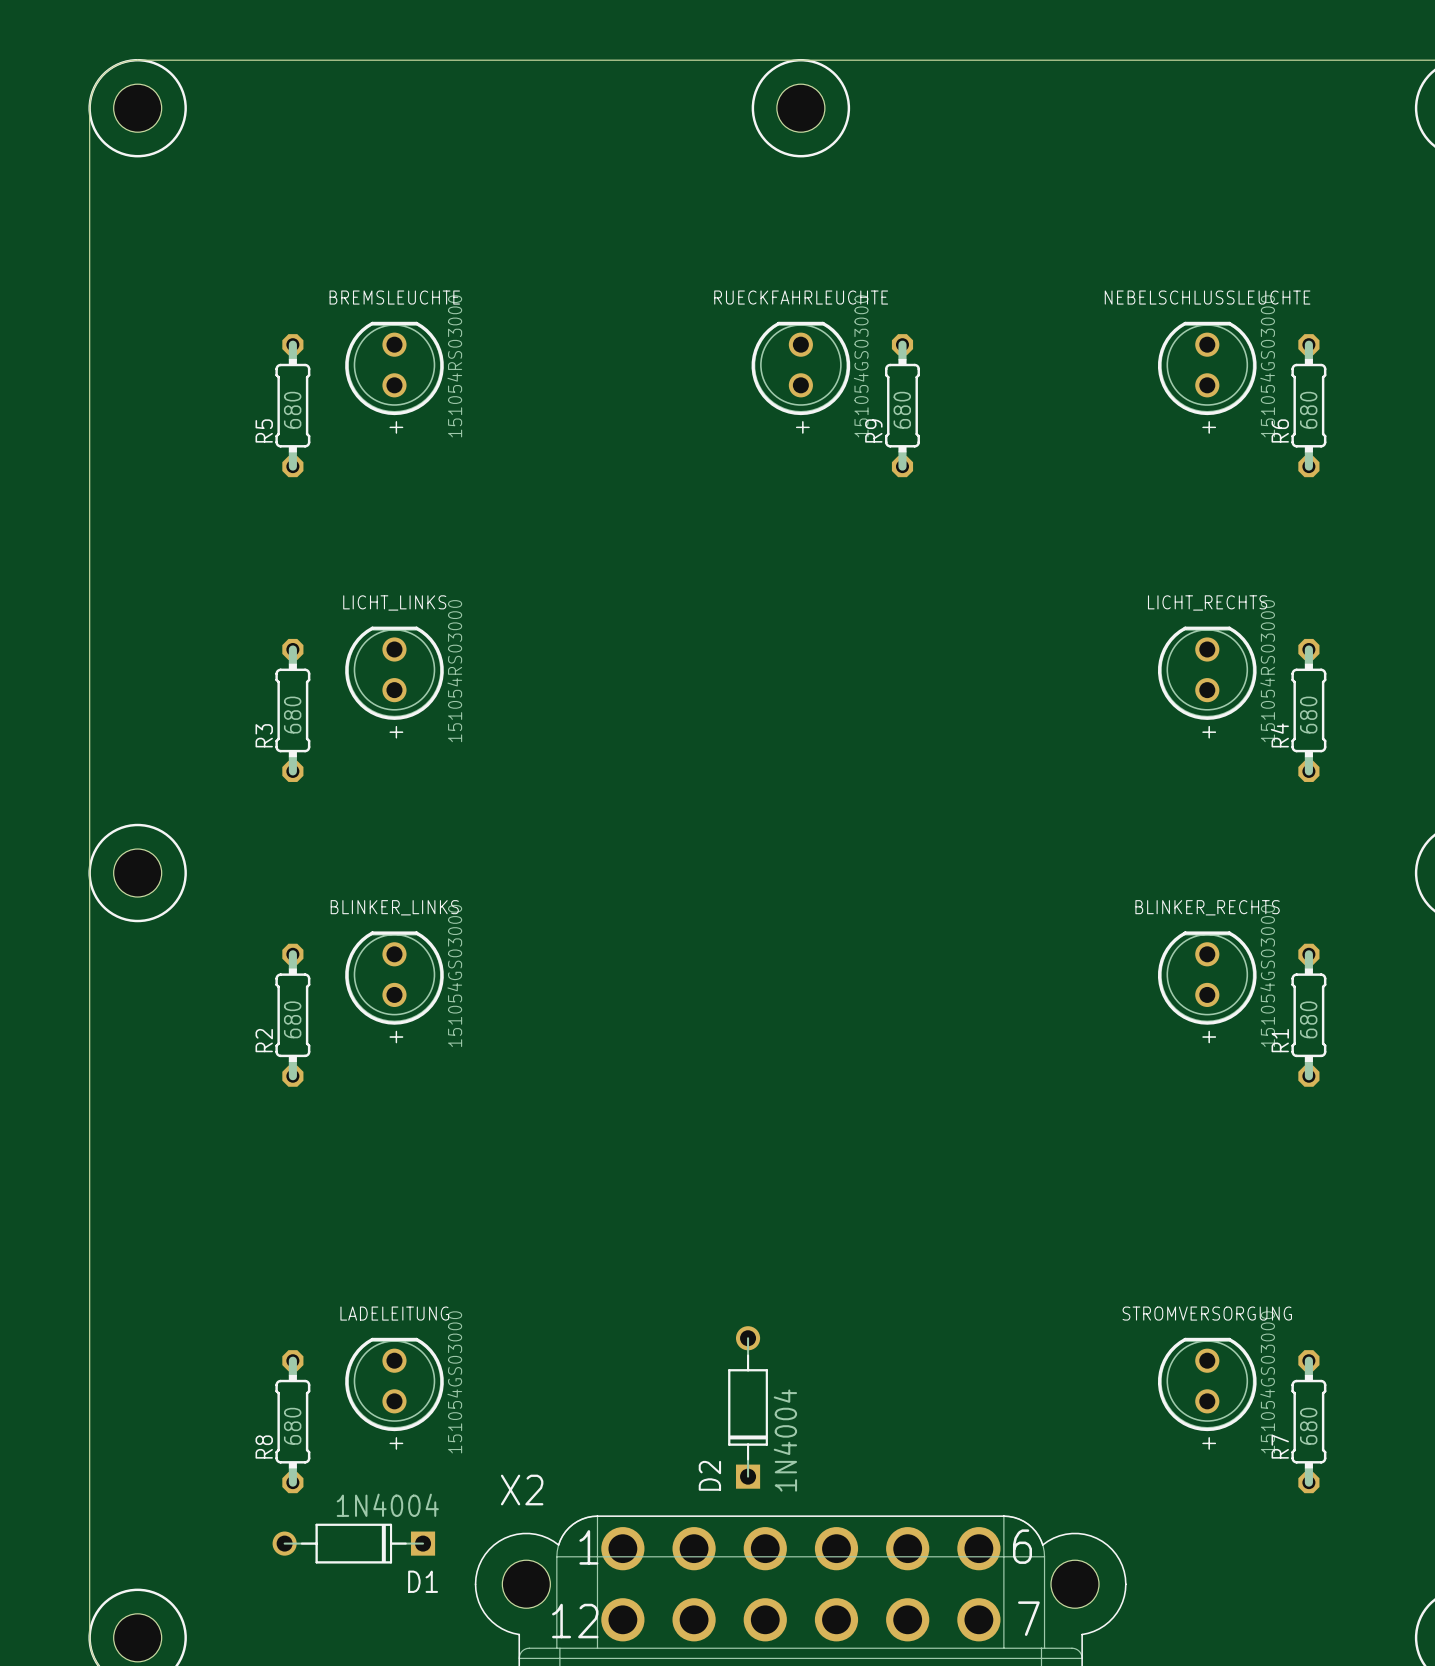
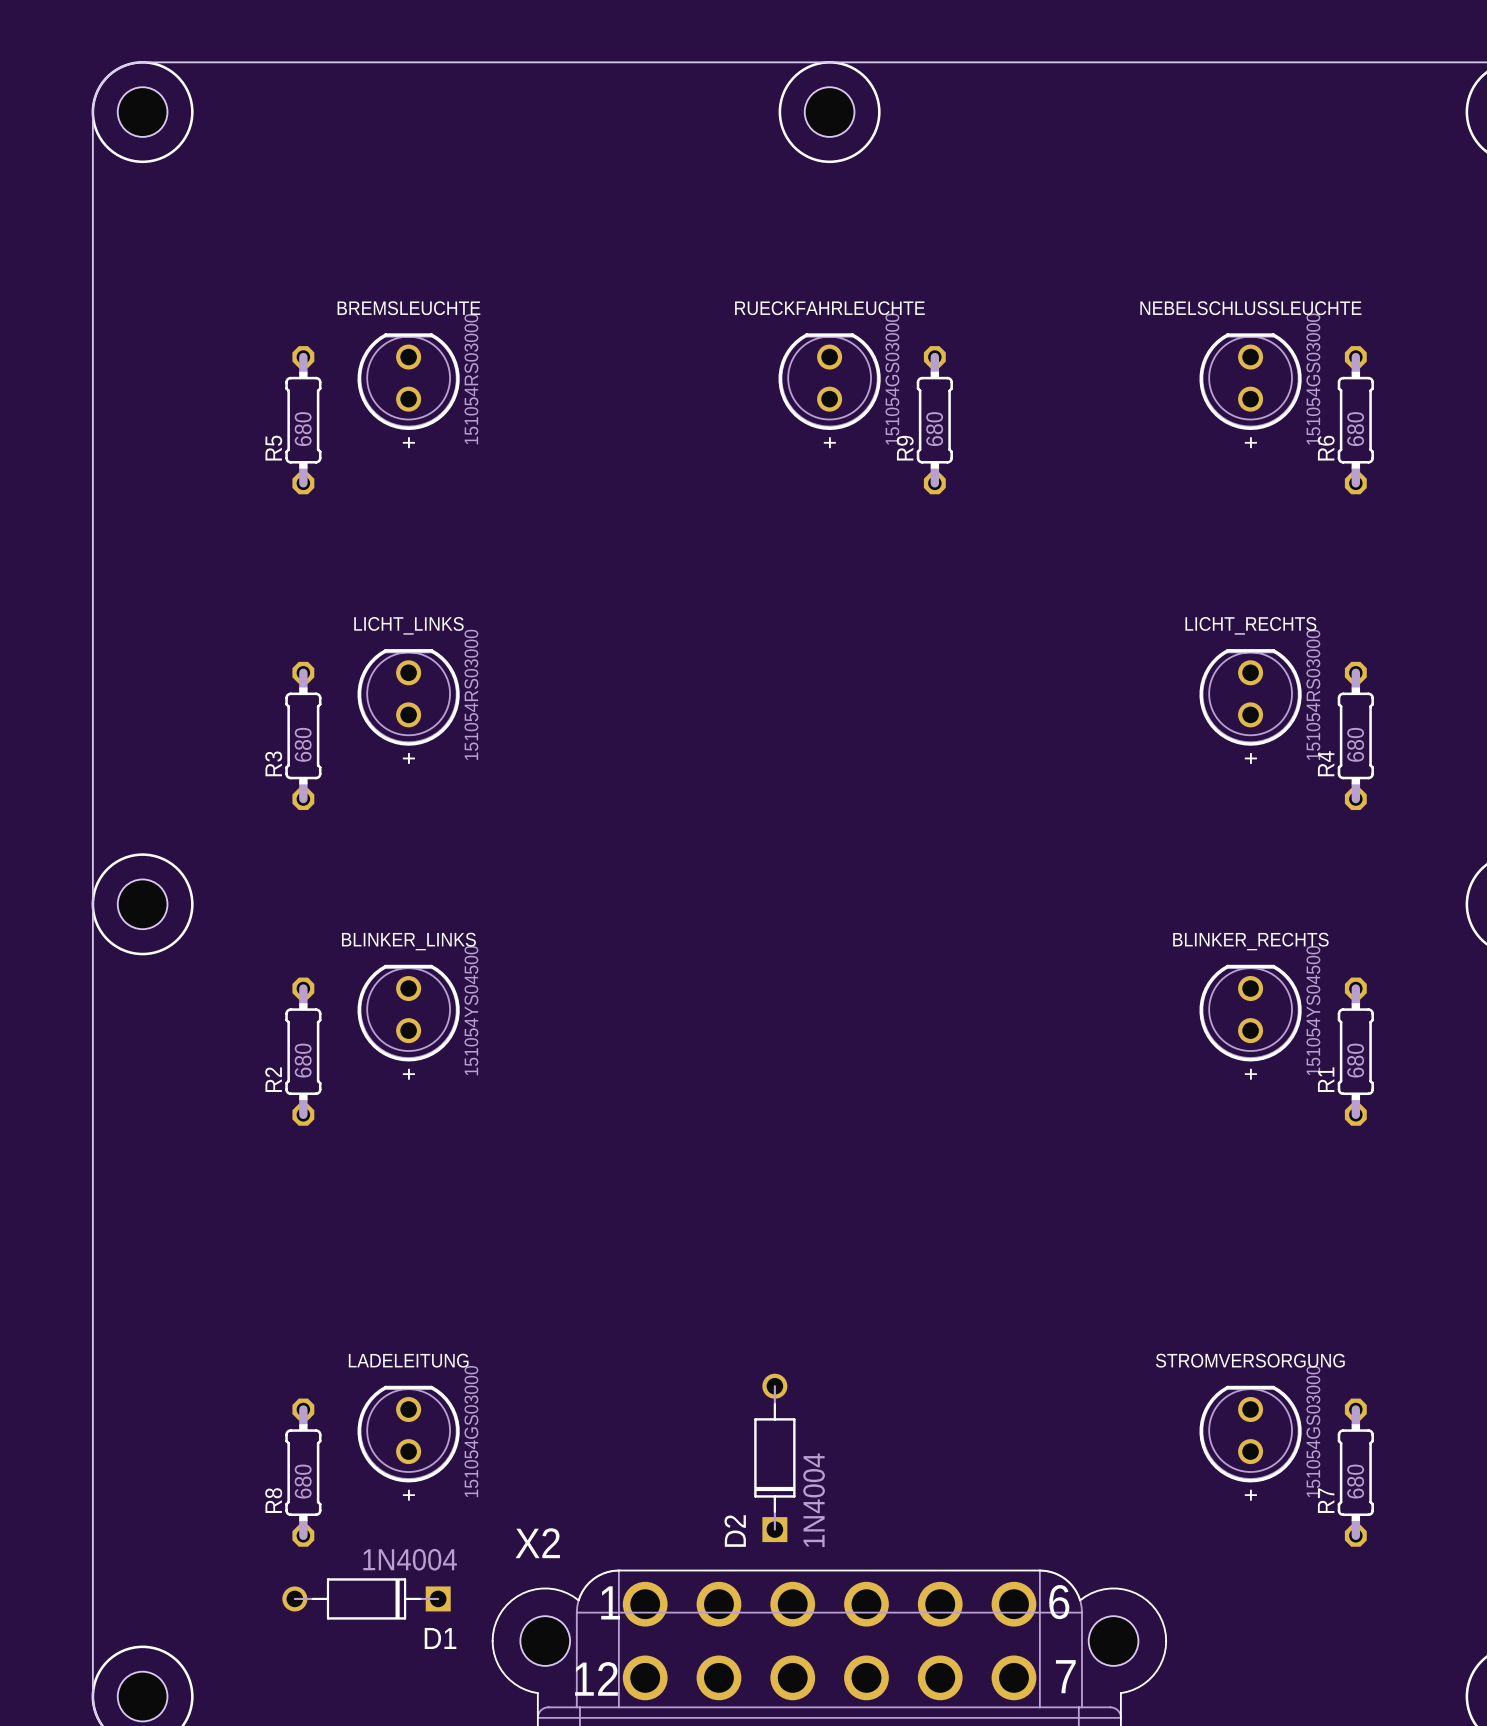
BLINKER_LINKS value: 151054GS03000 (454, 975) -> 151054YS04500 (471, 1010)
BLINKER_RECHTS value: 151054GS03000 (1267, 975) -> 151054YS04500 (1313, 1010)

